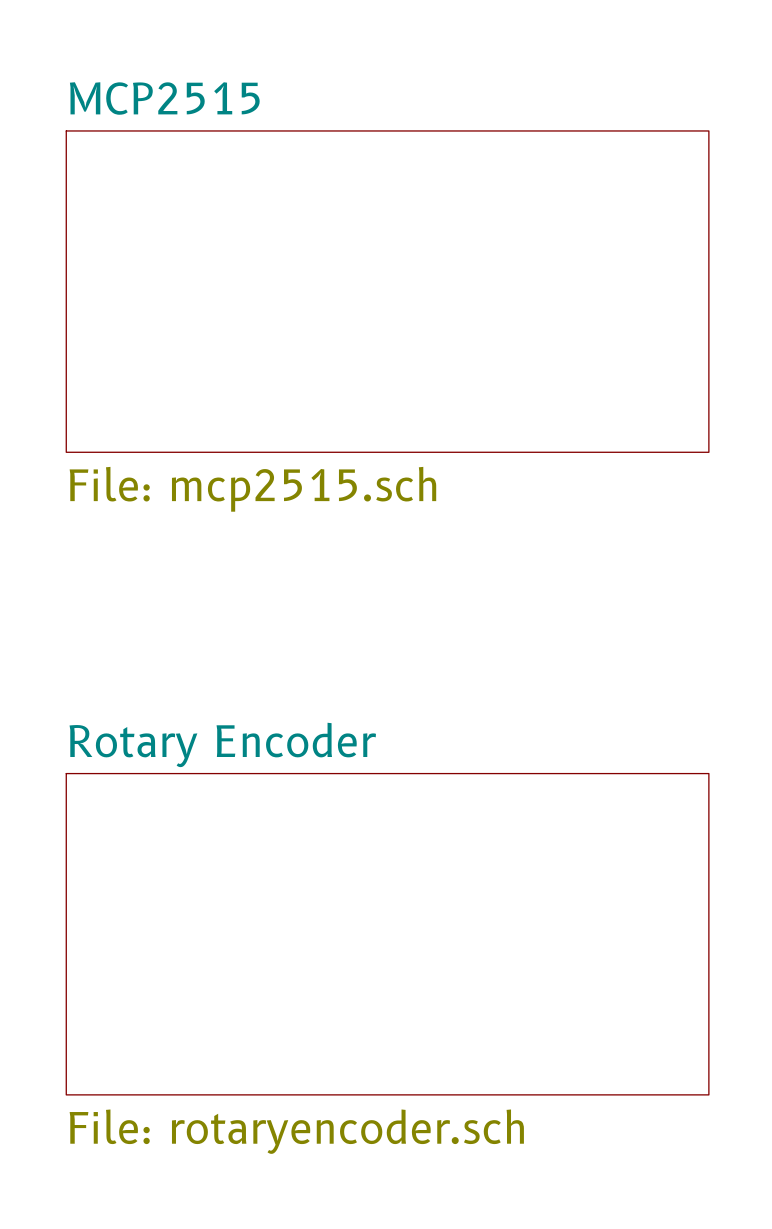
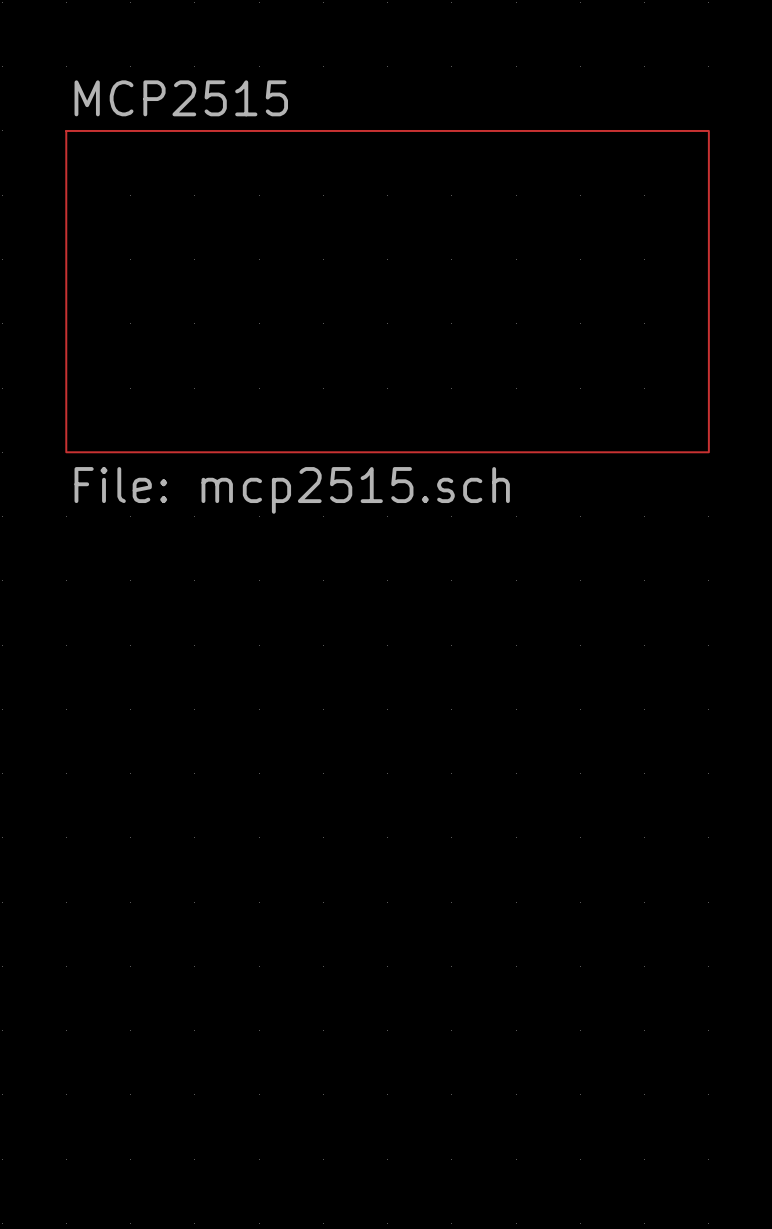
sheet Rotary Encoder: File: rotaryencoder.sch (387, 934) -> none

